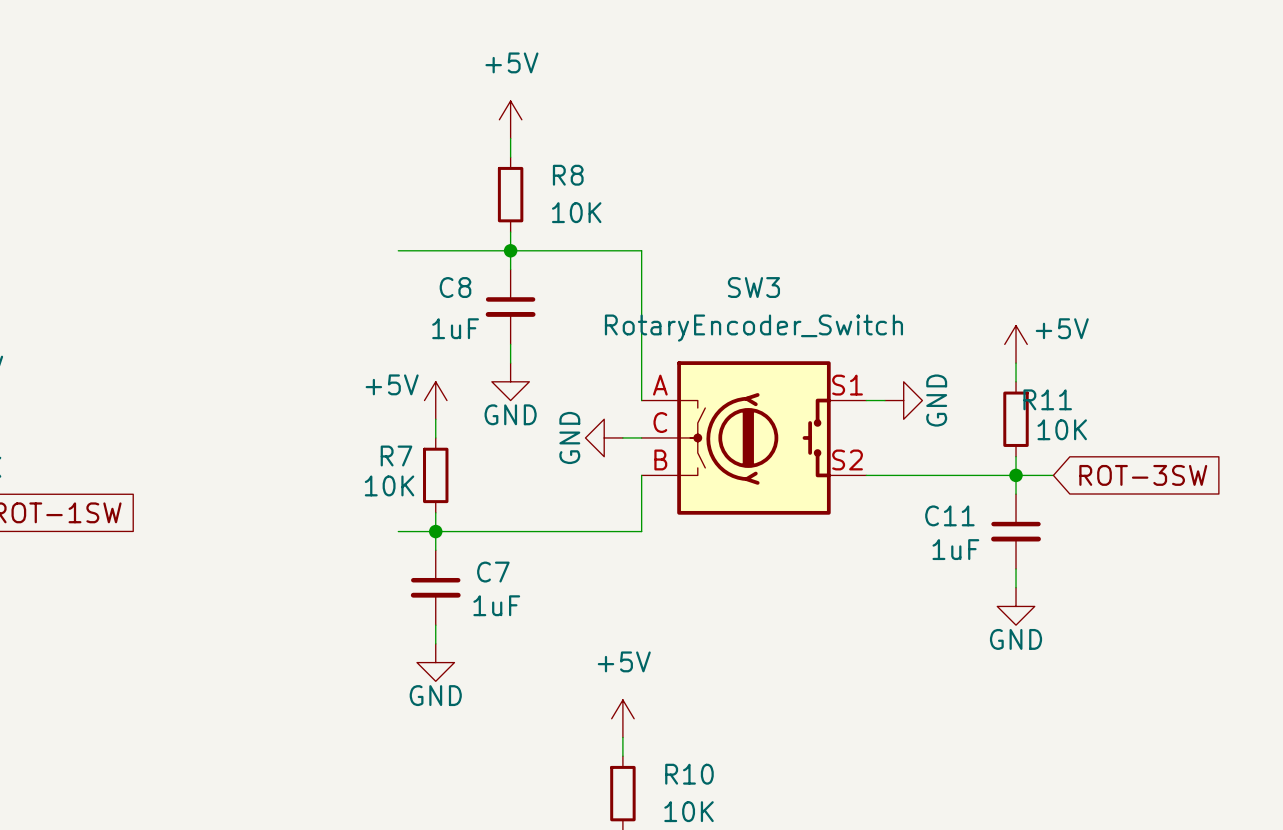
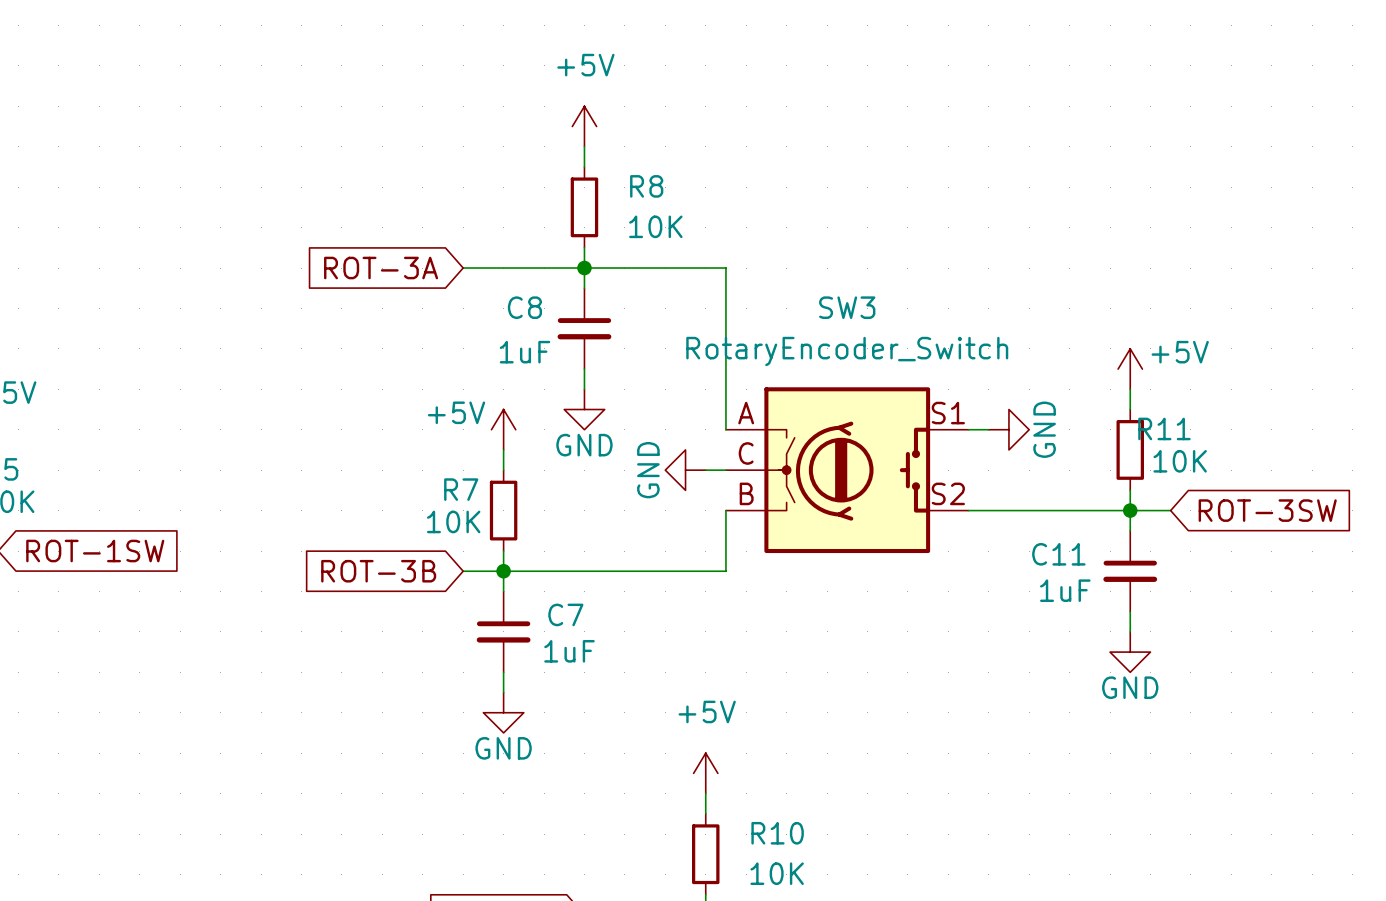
global label: none -> ROT-3A (381, 268)
global label: none -> ROT-3B (378, 571)

